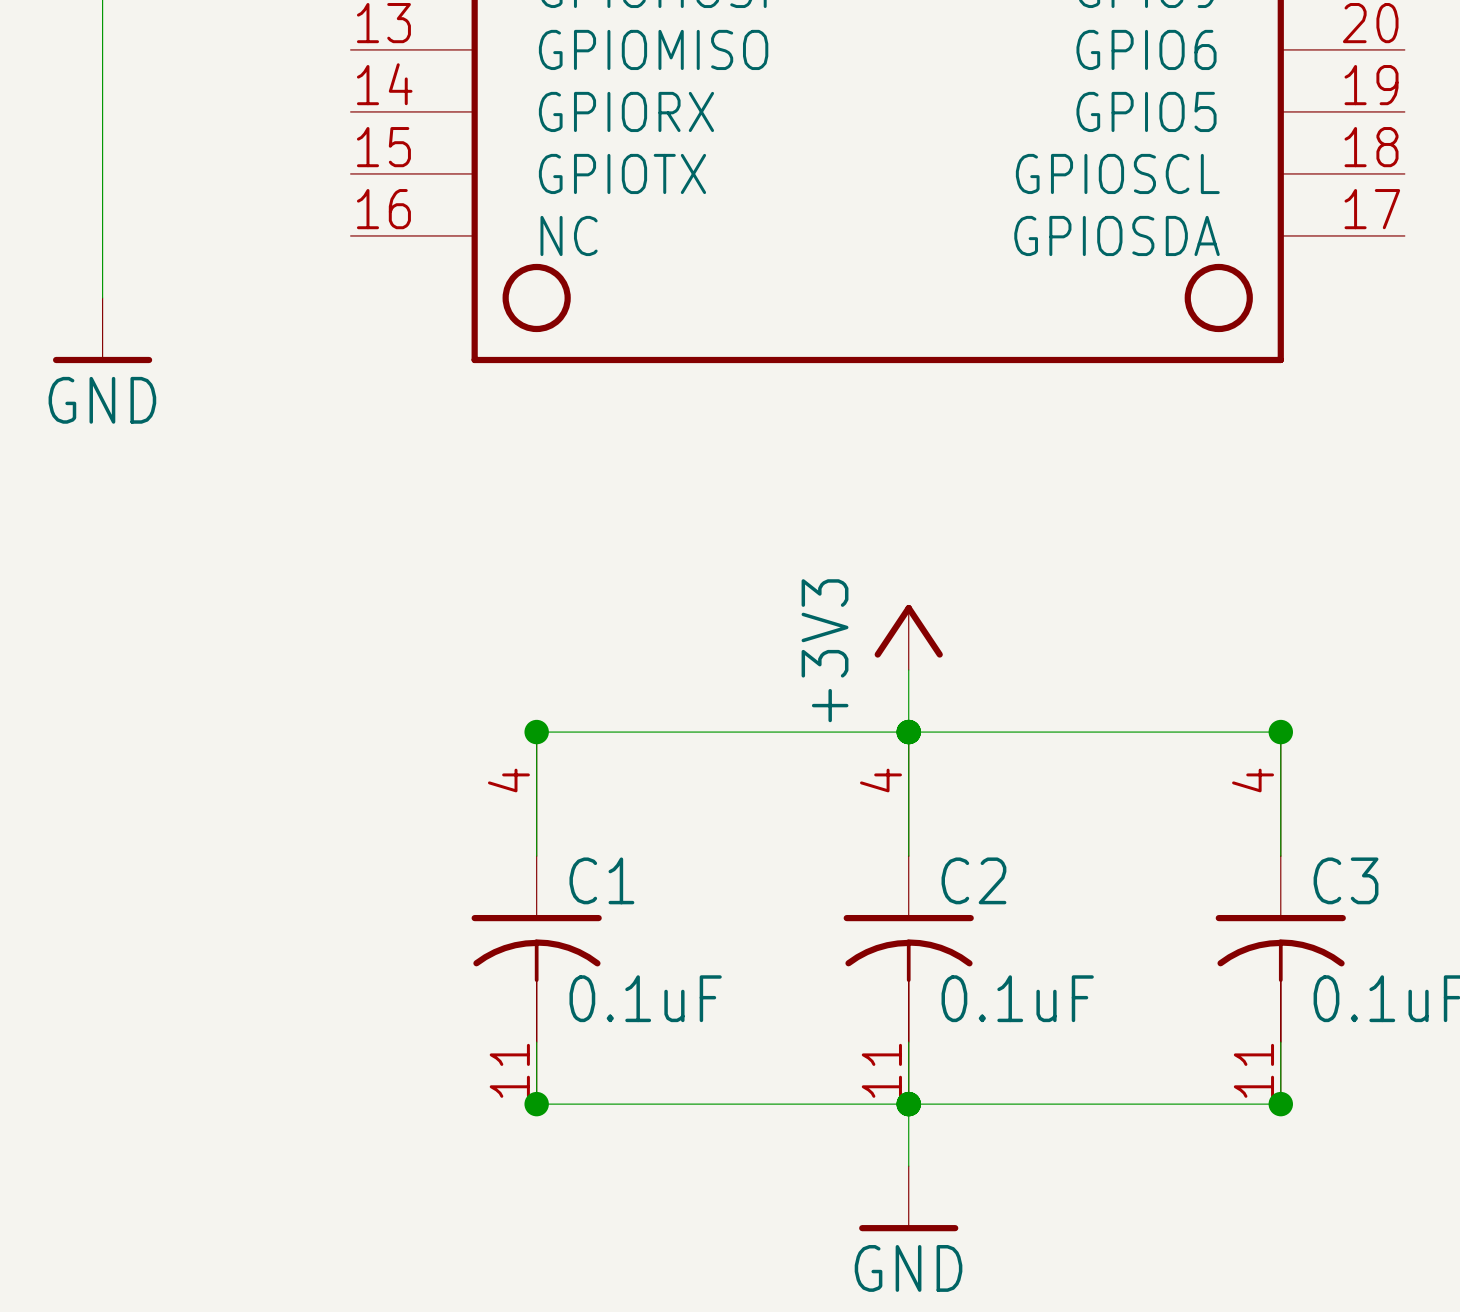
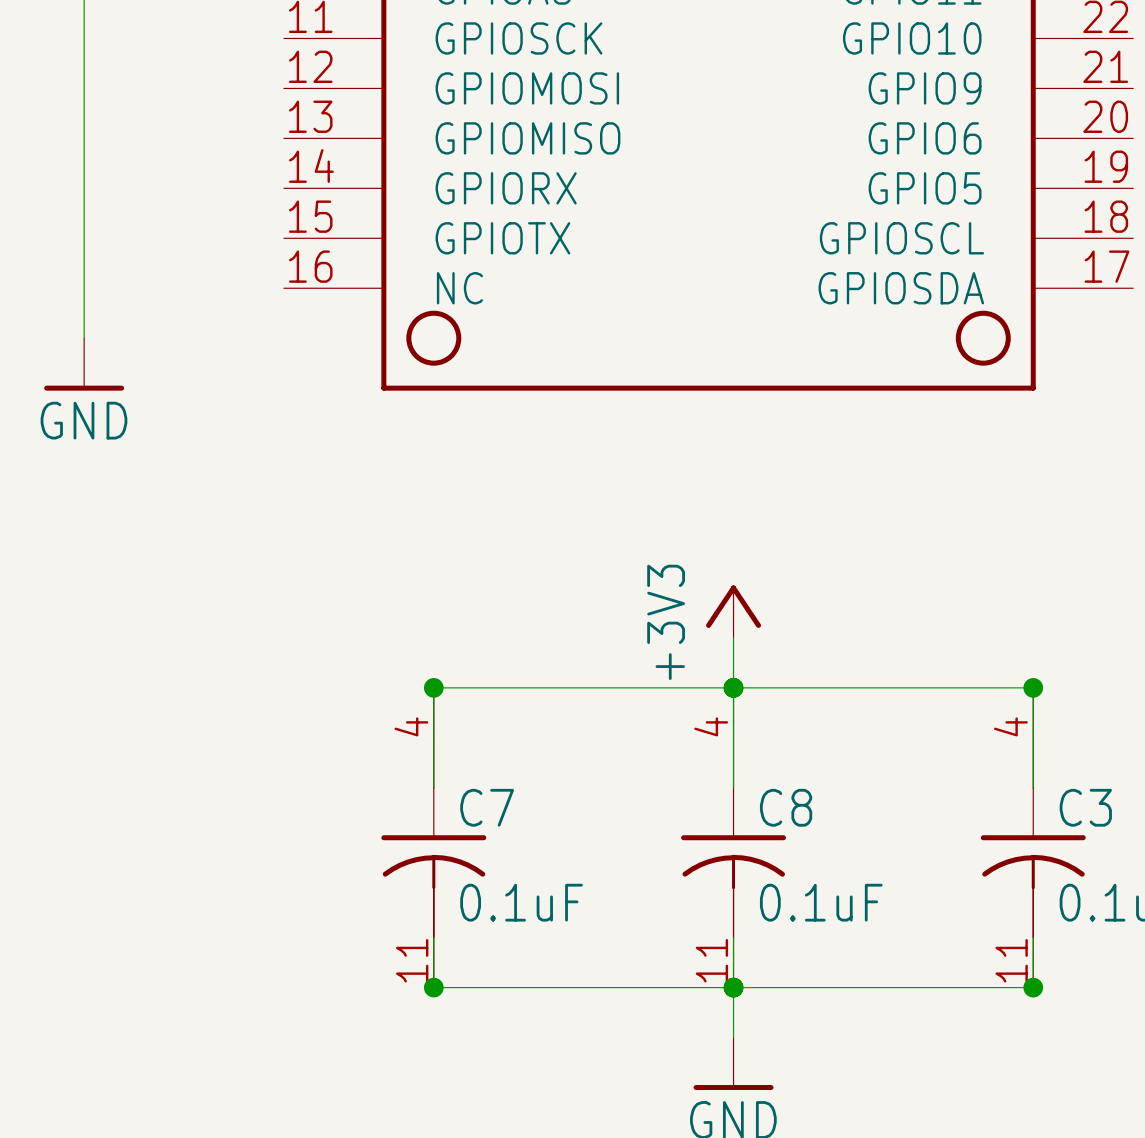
C1 name: C1 (601, 880) -> C7 (487, 807)
C2 name: C2 (973, 880) -> C8 (786, 807)

